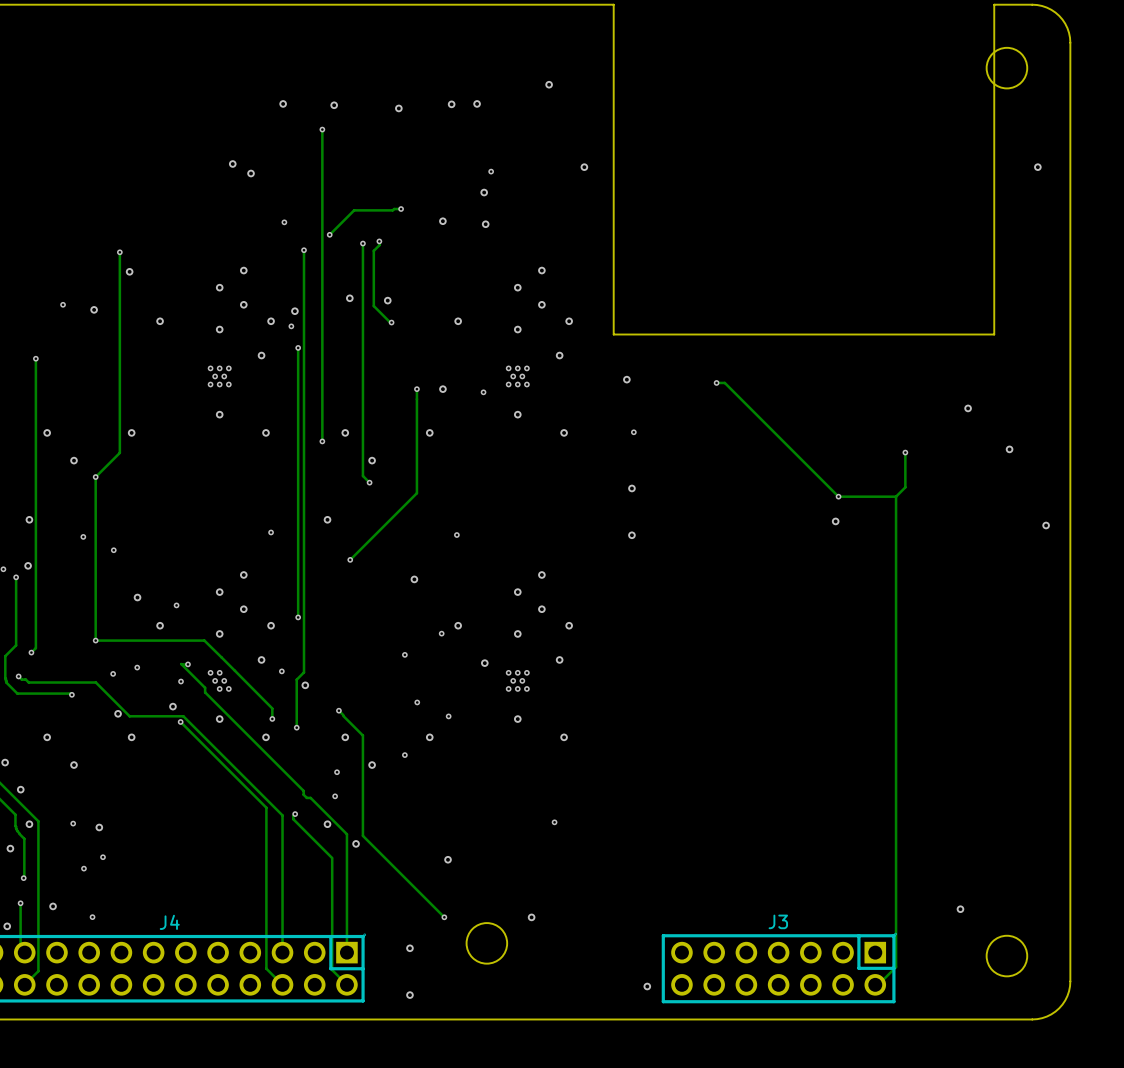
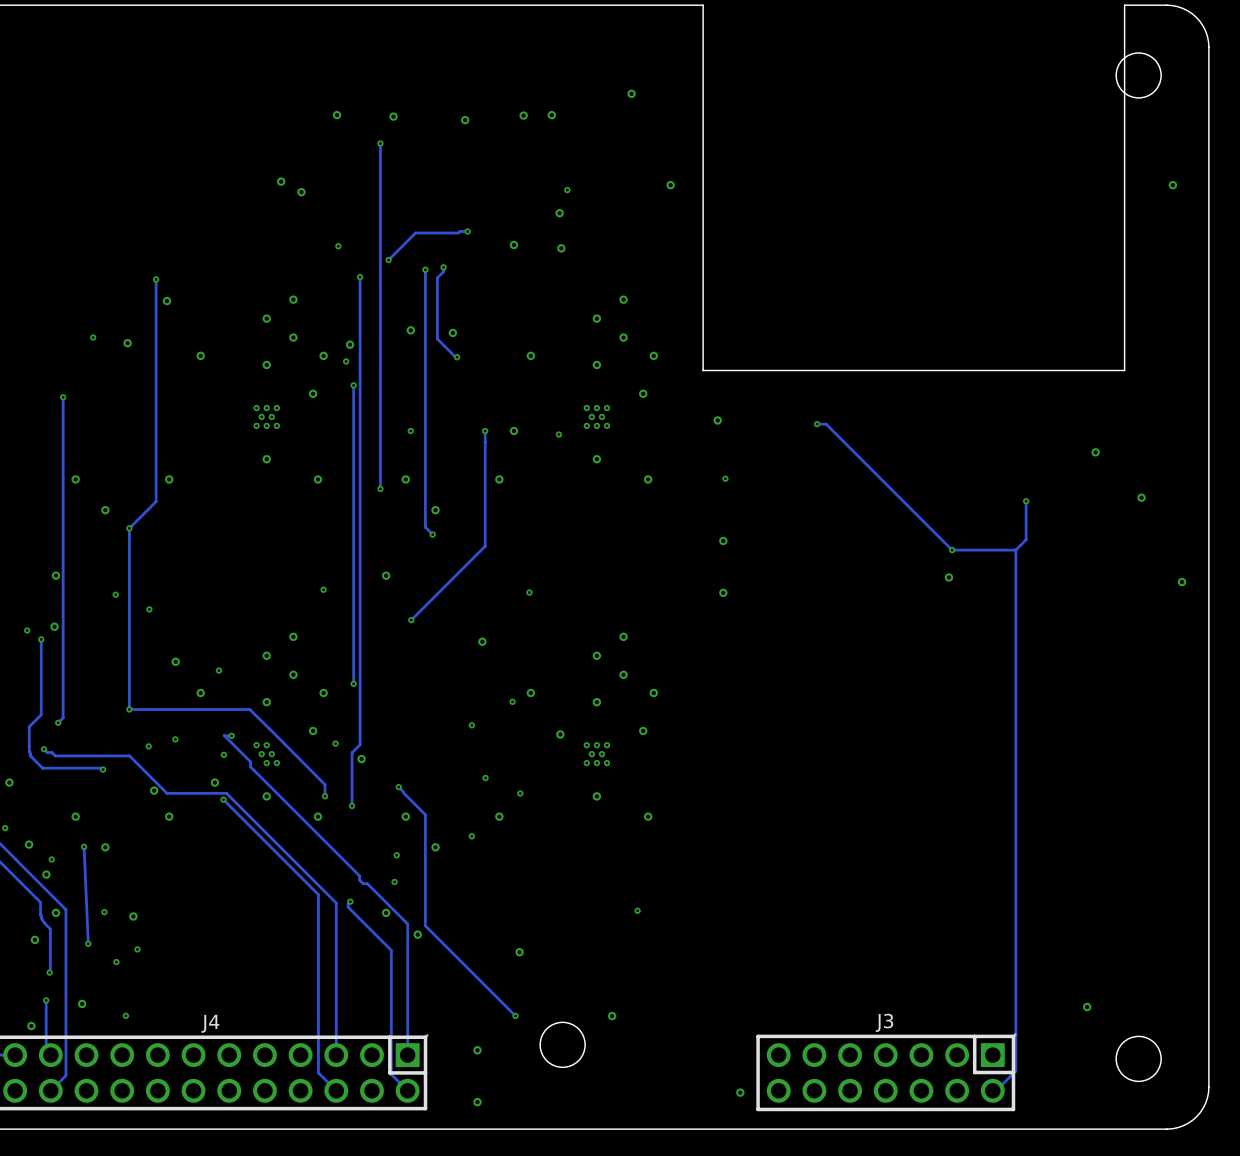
via: none -> (410, 431)
track: none -> (84, 846) (88, 943)
via: none -> (84, 846)
via: none -> (51, 859)
via: none -> (88, 943)

